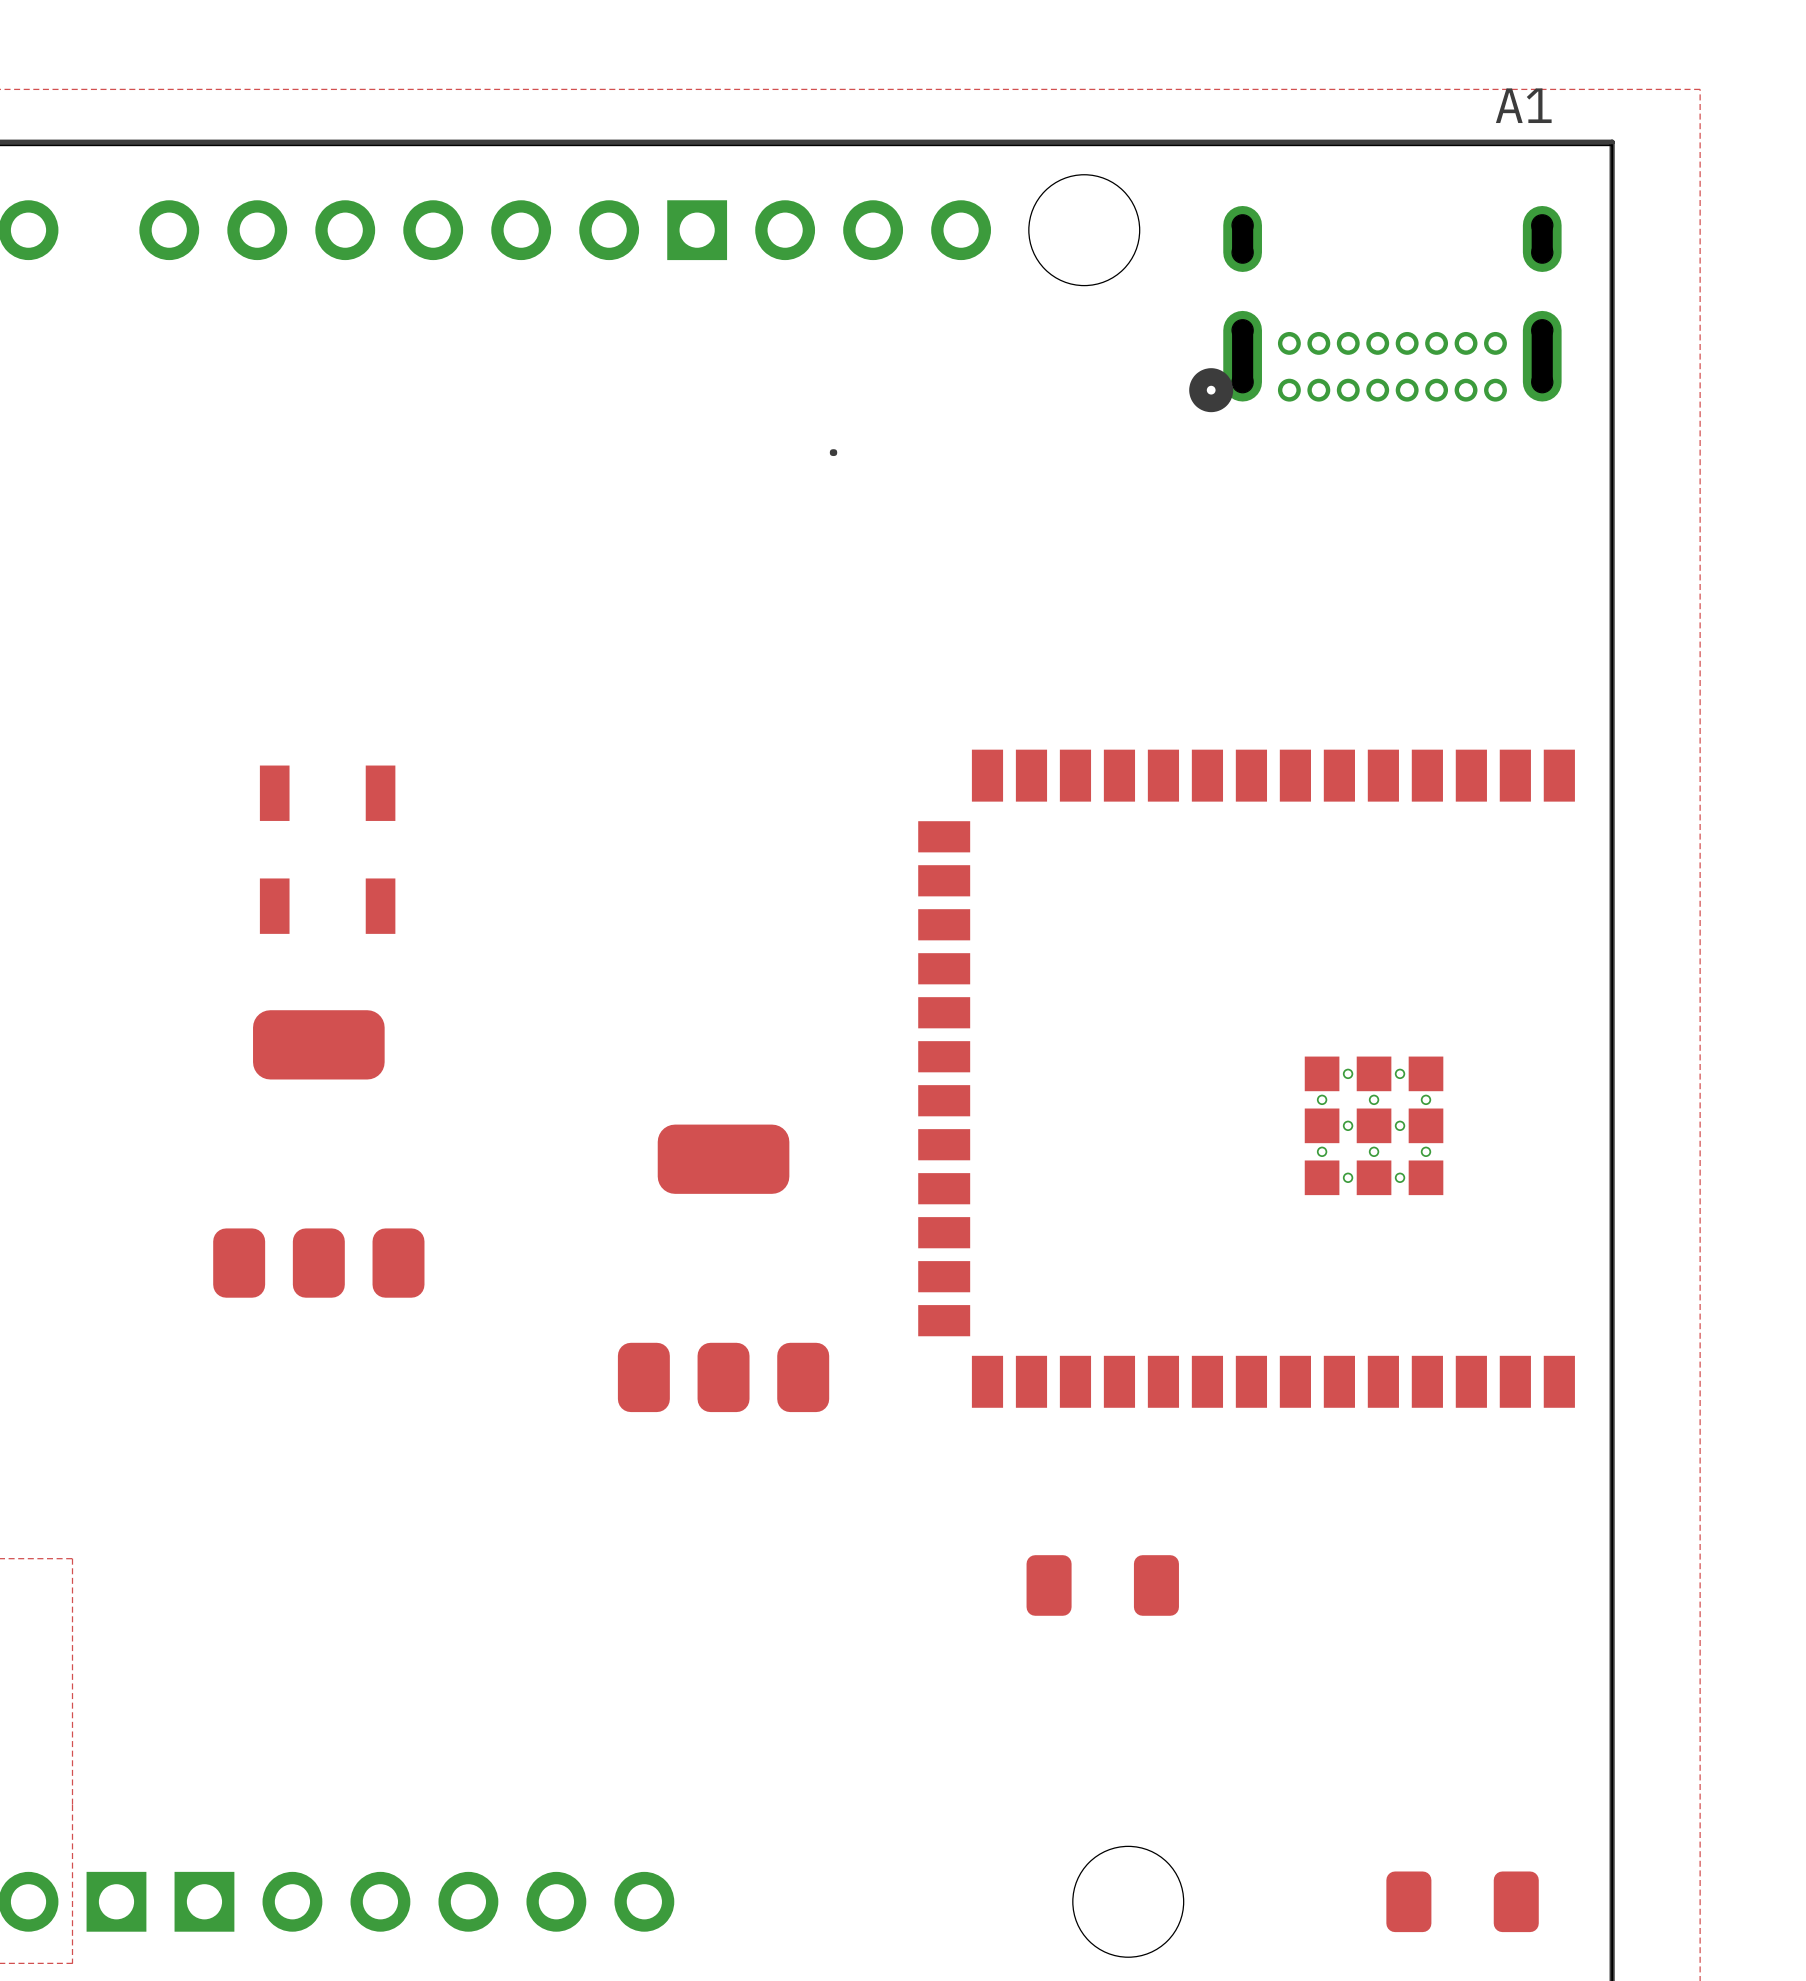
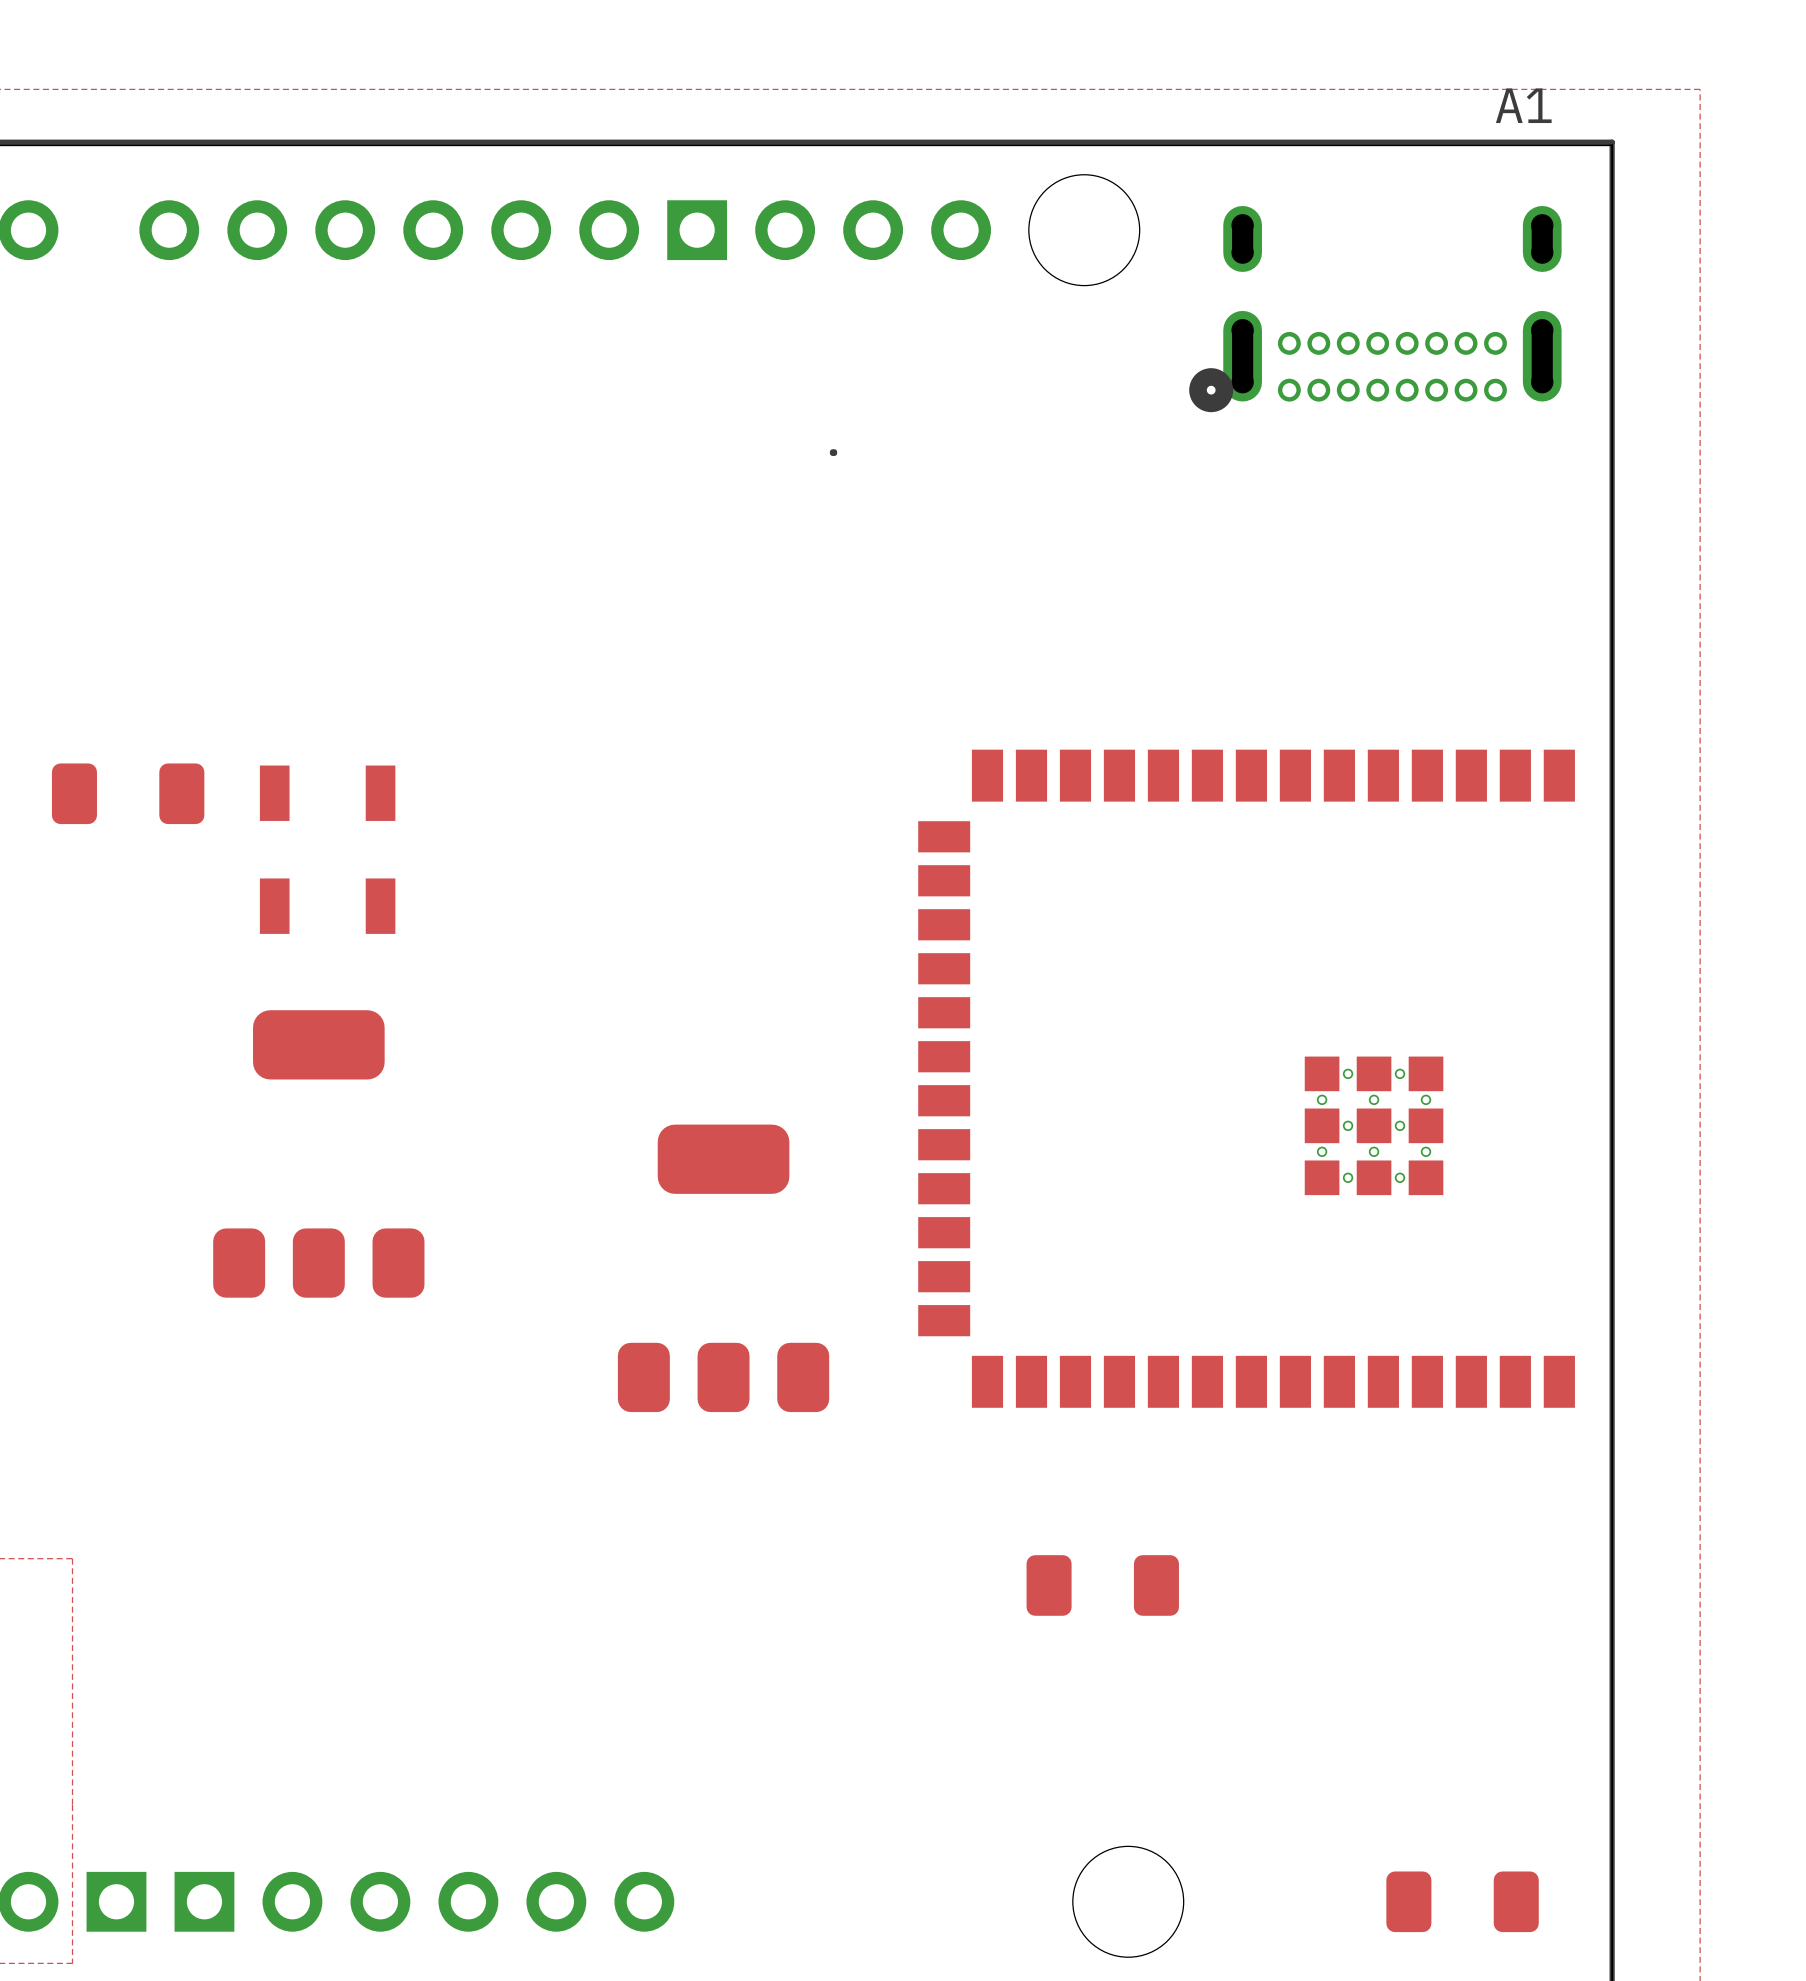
part: none -> (128, 793)

